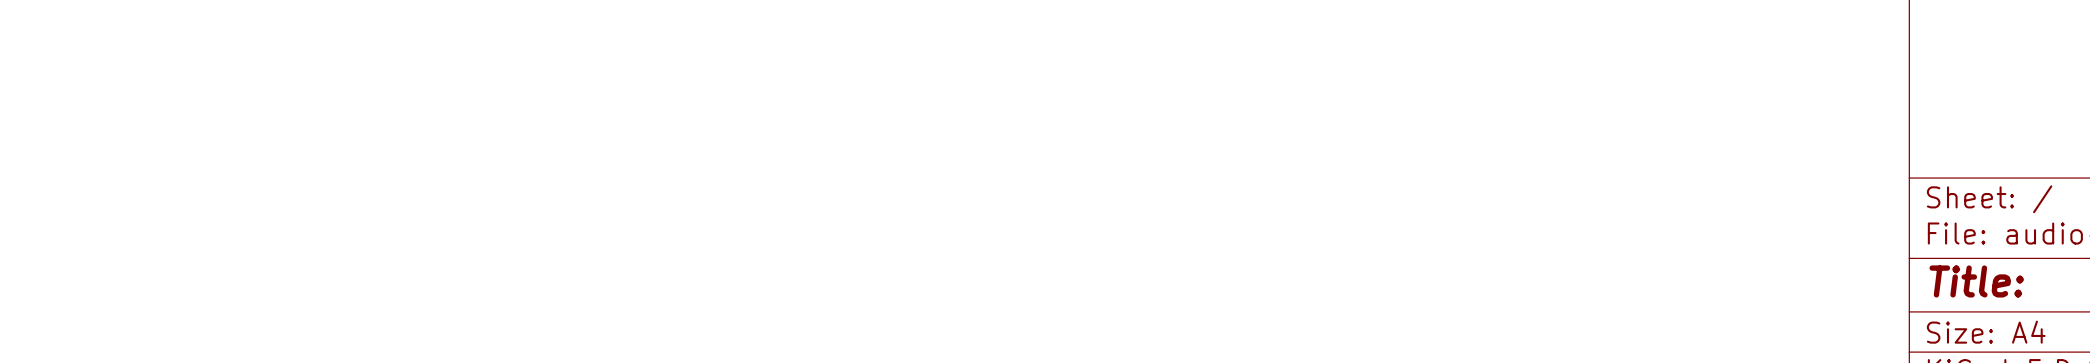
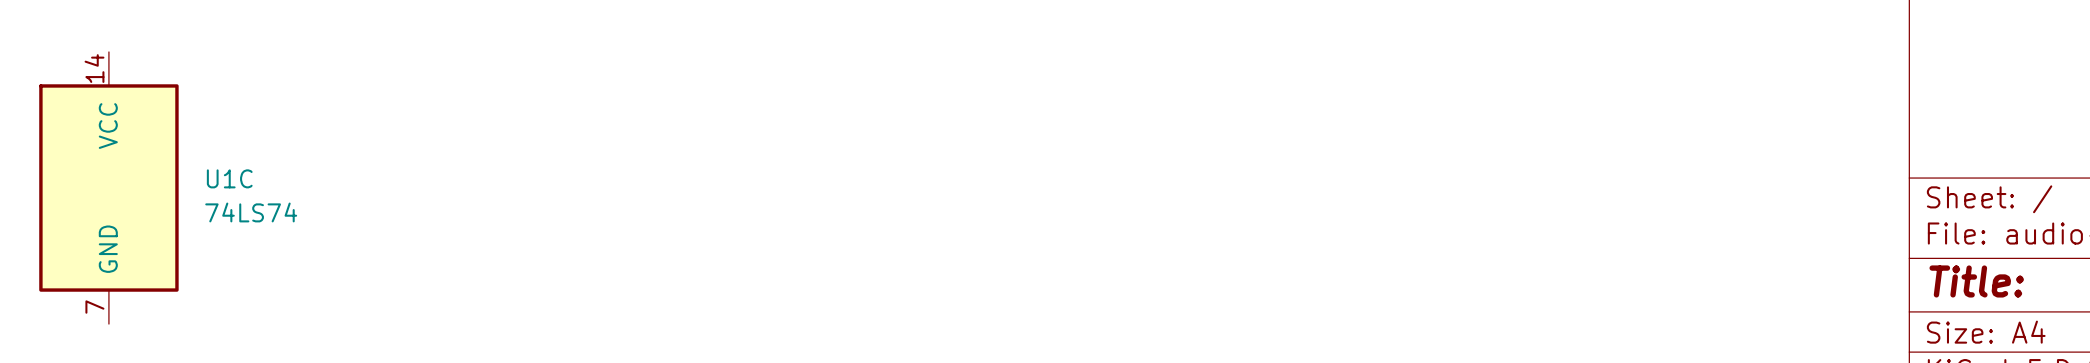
U1C: none -> 74LS74 (108, 188)

